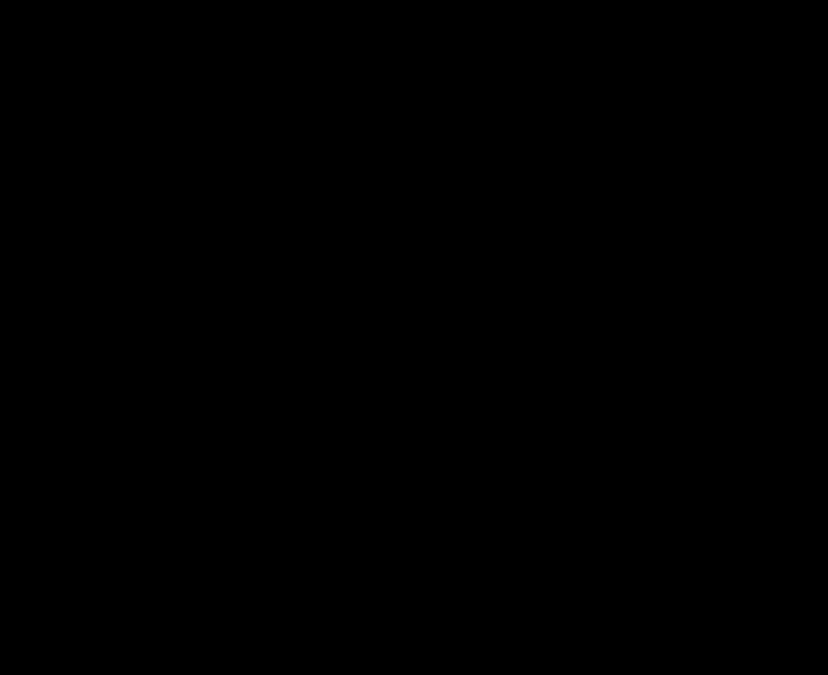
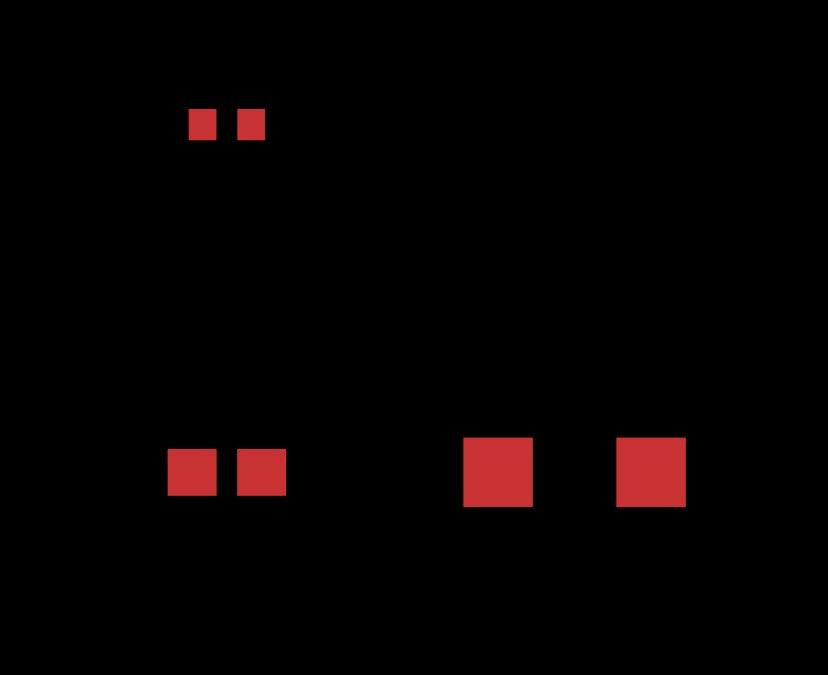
part: none -> (226, 124)
part: none -> (226, 472)
part: none -> (574, 472)

